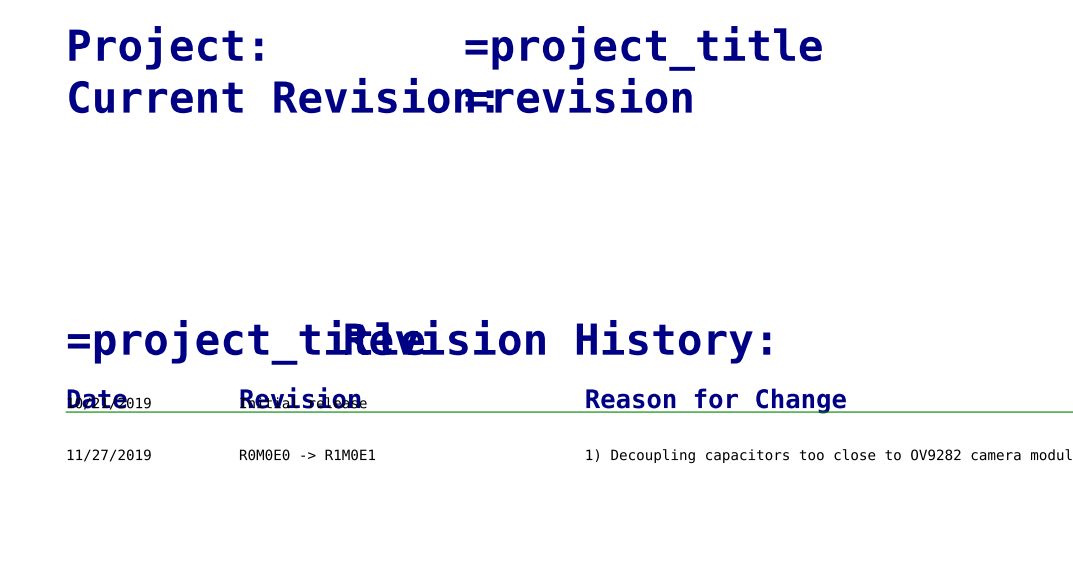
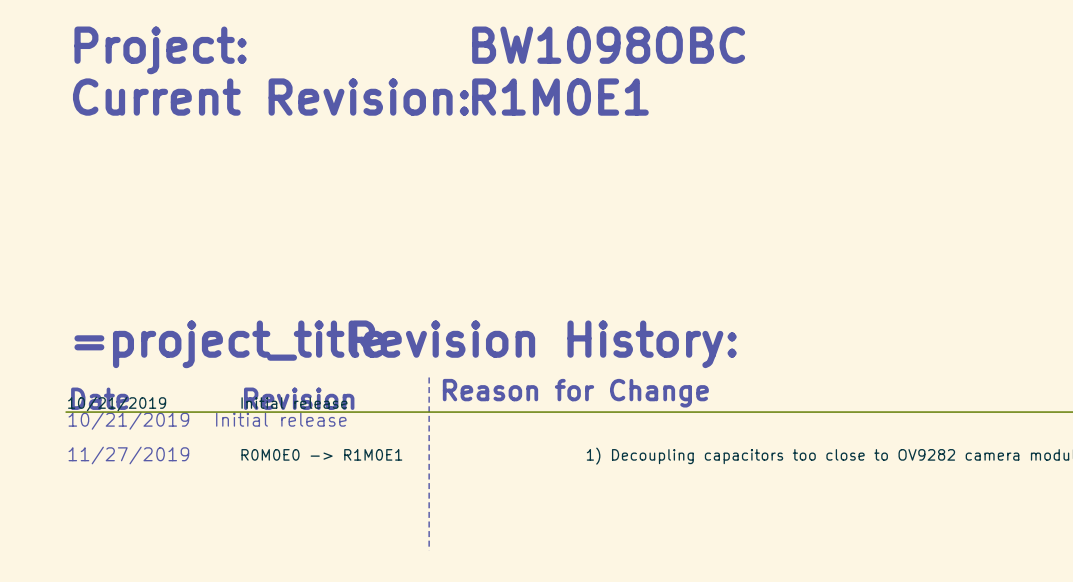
text: =project_title (643, 48) -> BW1098OBC (608, 45)
text: =revision (578, 95) -> R1M0E1 (560, 97)
line: none -> (429, 377) (429, 550)
text position: Reason for Change (716, 400) -> Reason for Change (575, 393)
text: none -> Initial release (281, 419)
text: none -> 10/21/2019 (128, 420)
text: none -> 11/27/2019 (128, 455)
label: 11/27/2019 (109, 455) -> none

